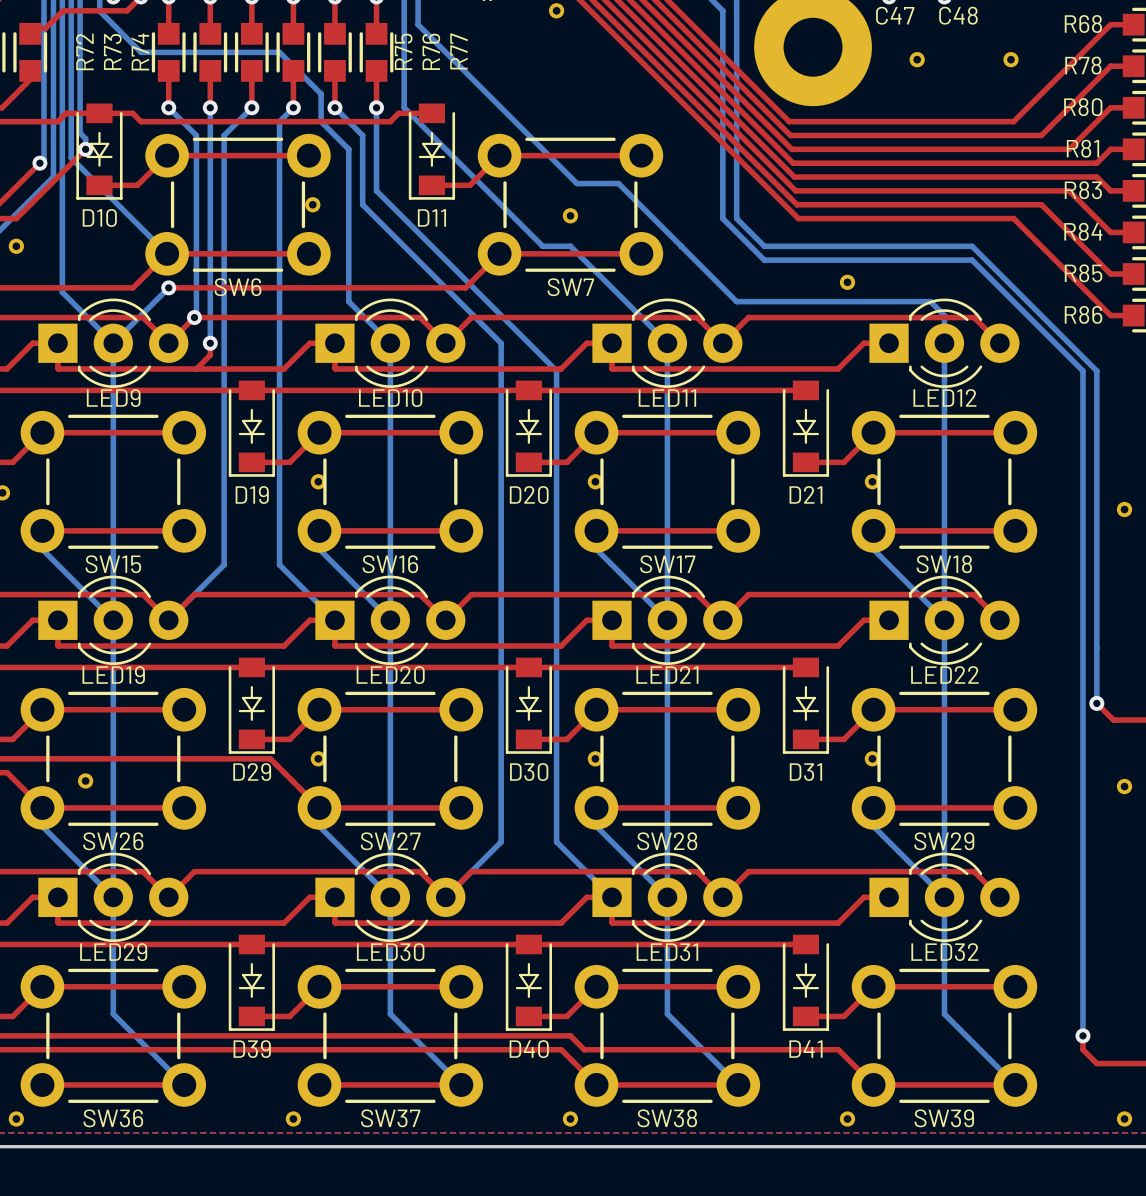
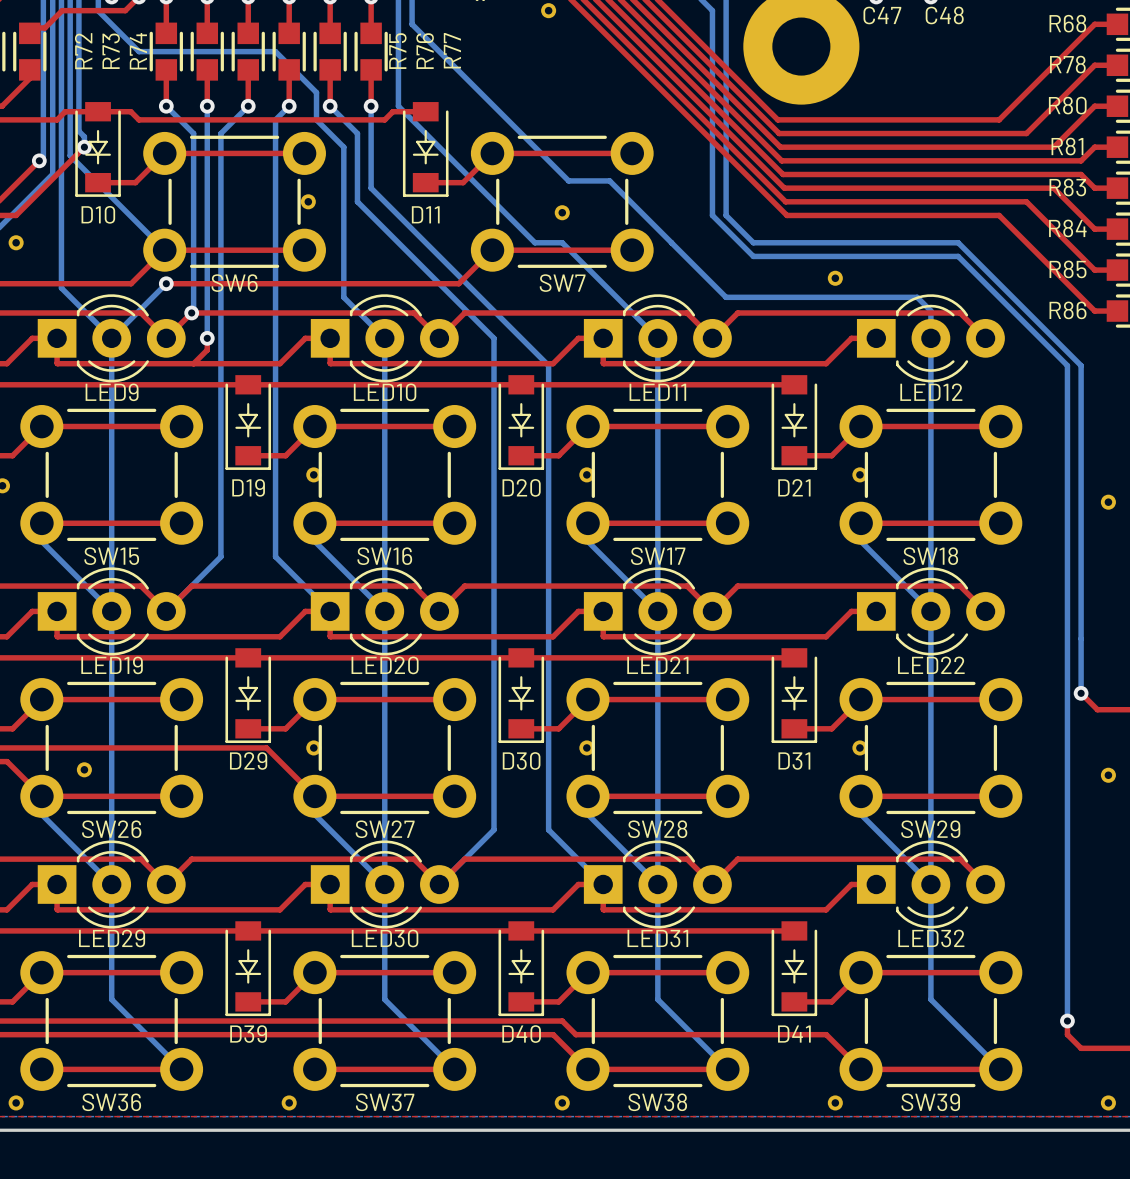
part: (917, 59) -> none
part: (1010, 59) -> none

